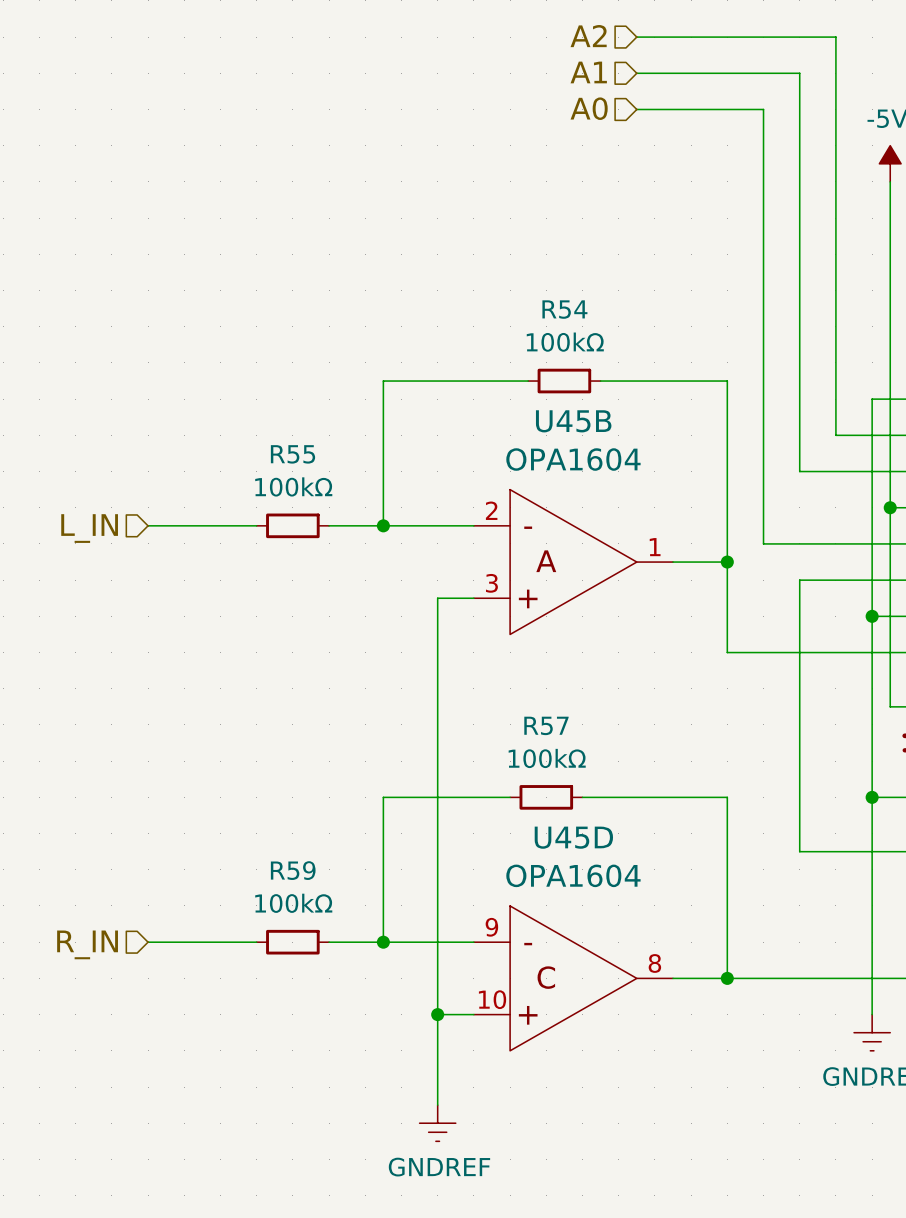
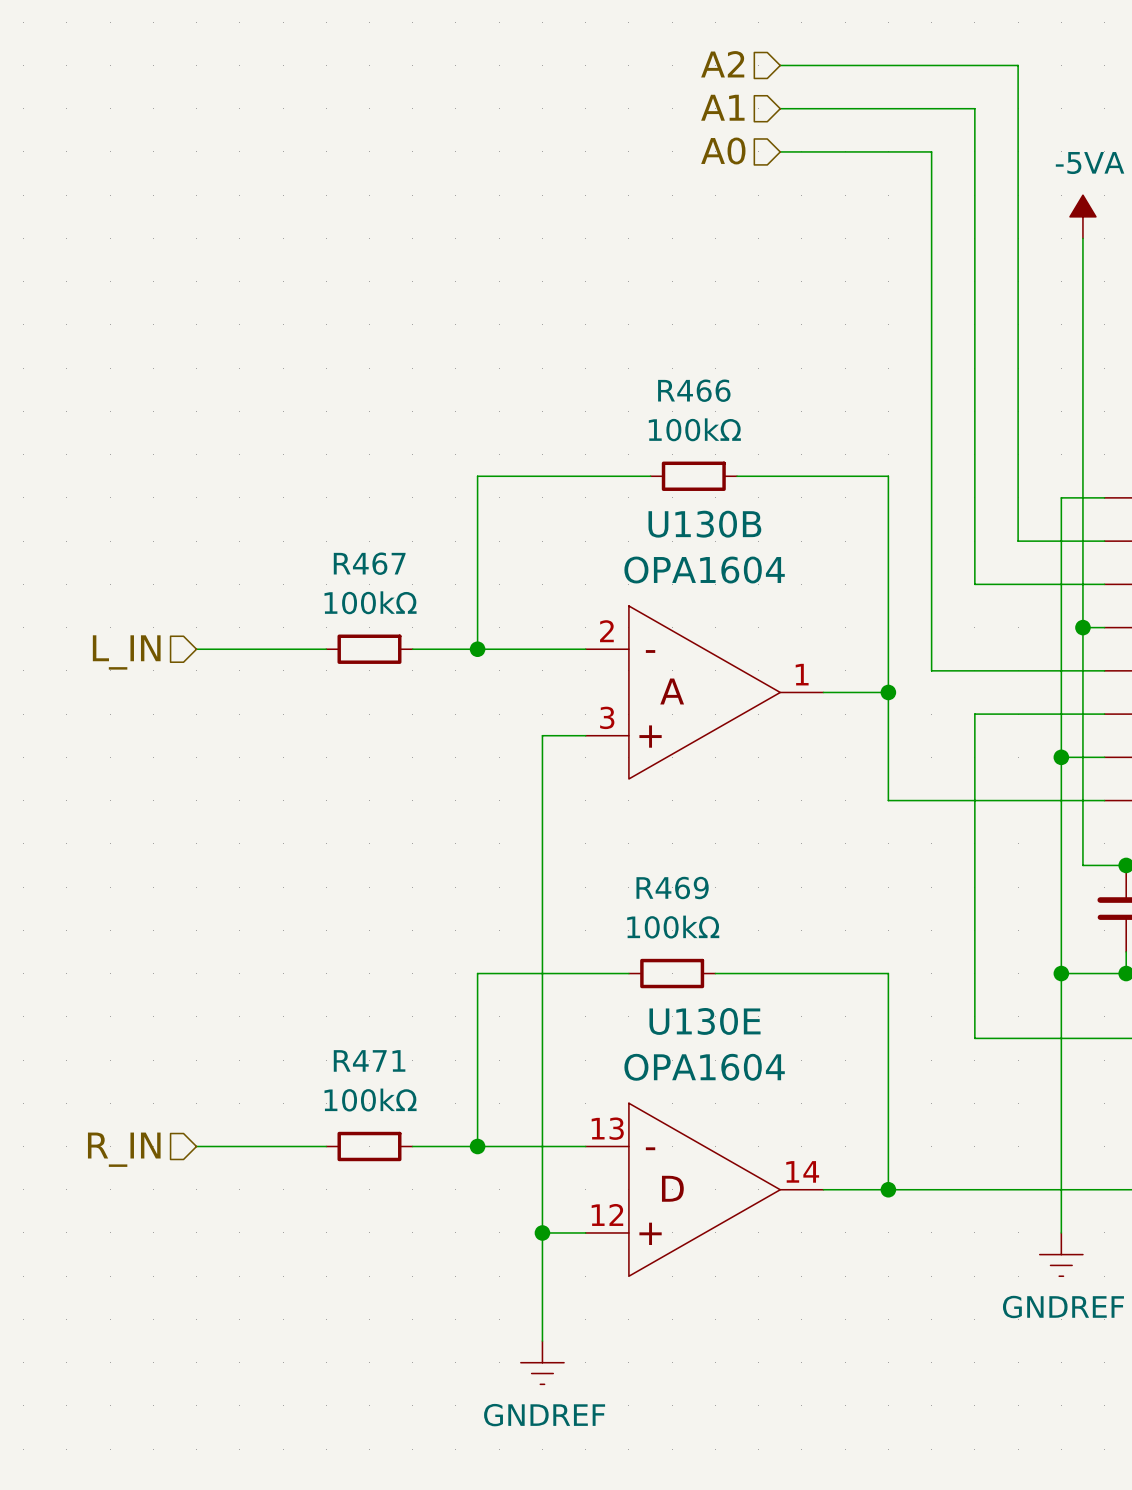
R54 name: R54 (564, 309) -> R466 (694, 390)
U45B name: U45B (573, 421) -> U130B (704, 524)
R55 name: R55 (293, 454) -> R467 (369, 563)
R57 name: R57 (546, 725) -> R469 (672, 887)
U45D name: U45D (573, 837) -> U130E (705, 1021)
R59 name: R59 (293, 870) -> R471 (369, 1060)
U45D pin number: 9 (491, 927) -> 13 (607, 1128)
U45D pin number: 8 (654, 963) -> 14 (802, 1171)
U45D text: C (546, 977) -> D (672, 1188)
U45D pin number: 10 (492, 999) -> 12 (607, 1214)

